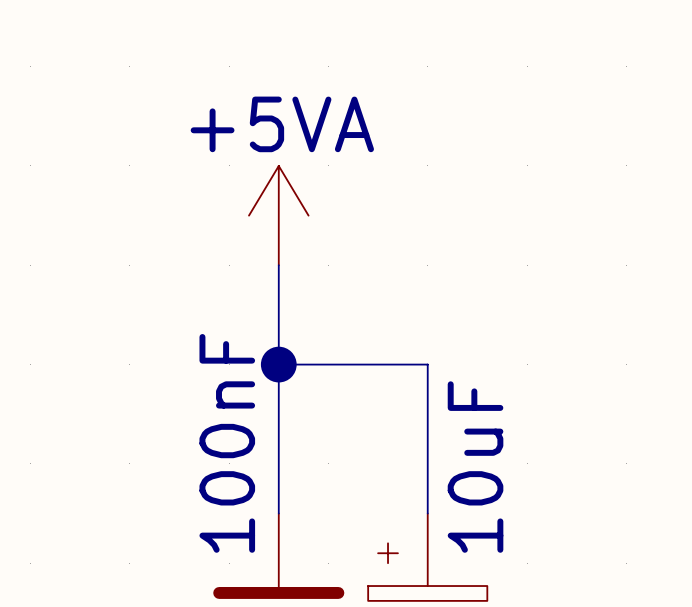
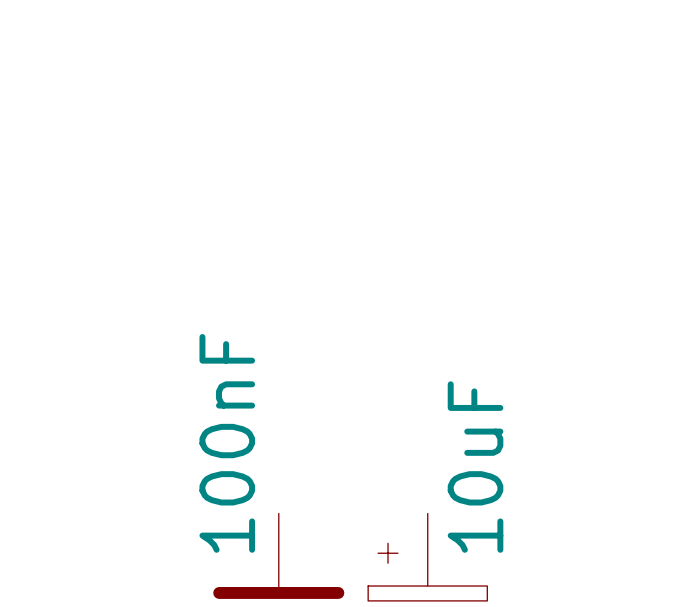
power symbol: +5VA (278, 215) -> none
wire: (278, 265) (278, 513) -> none
wire: (278, 364) (427, 364) (427, 513) -> none
junction: (278, 364) -> none

